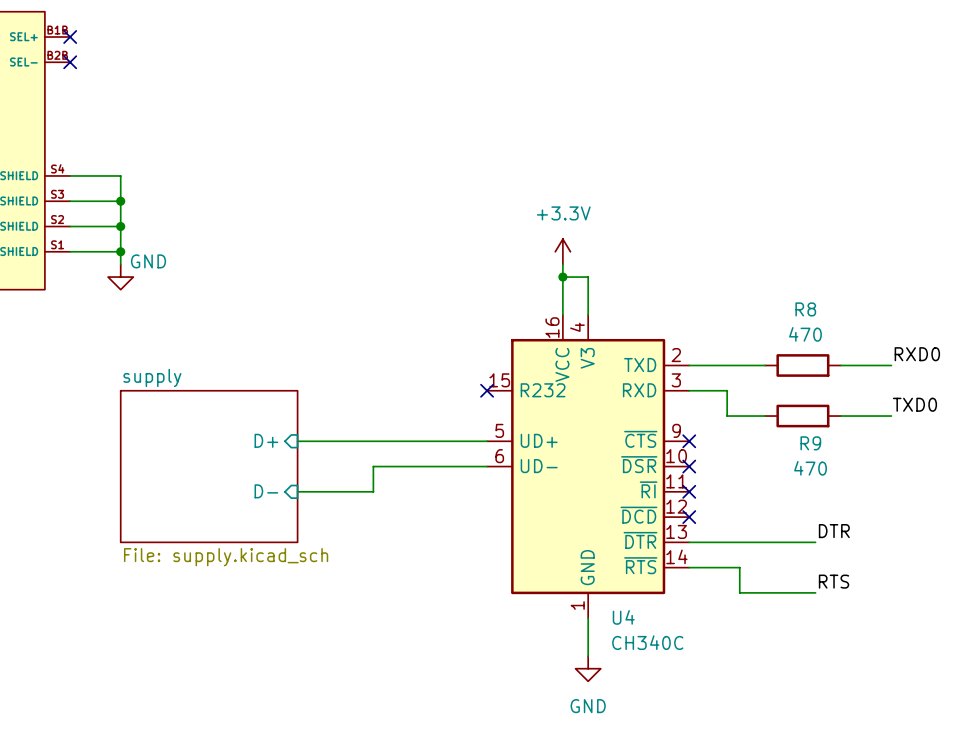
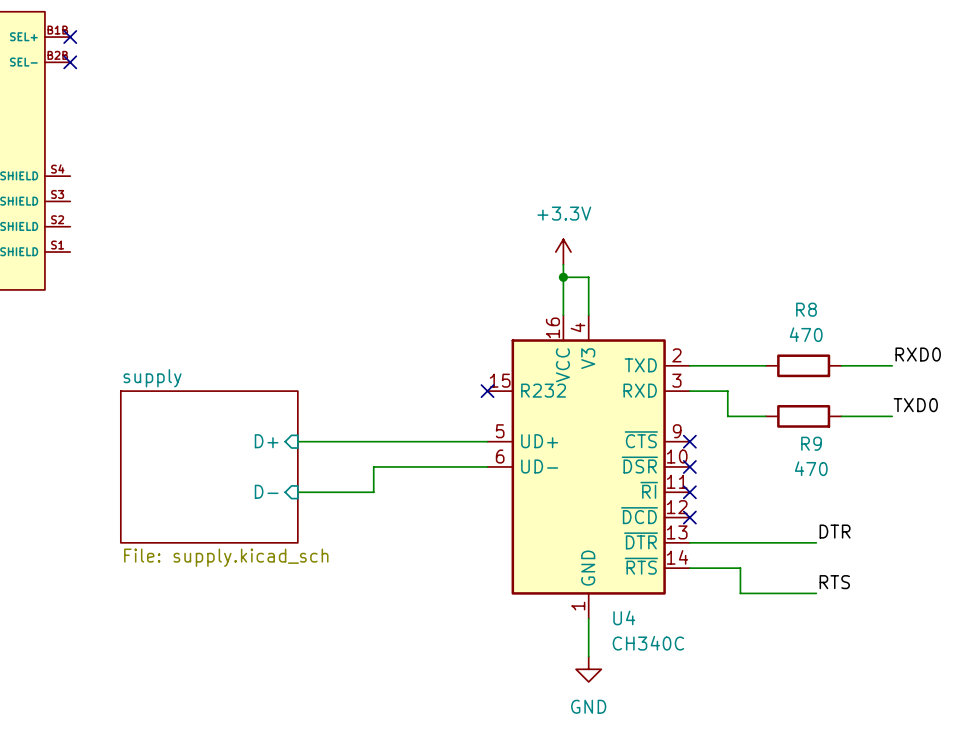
wire: (70, 175) (120, 175) (120, 264) -> none
wire: (70, 201) (120, 201) -> none
junction: (120, 201) -> none
wire: (70, 226) (120, 226) -> none
junction: (120, 226) -> none
wire: (70, 251) (120, 251) -> none
junction: (120, 251) -> none
power symbol: GND (120, 277) -> none

